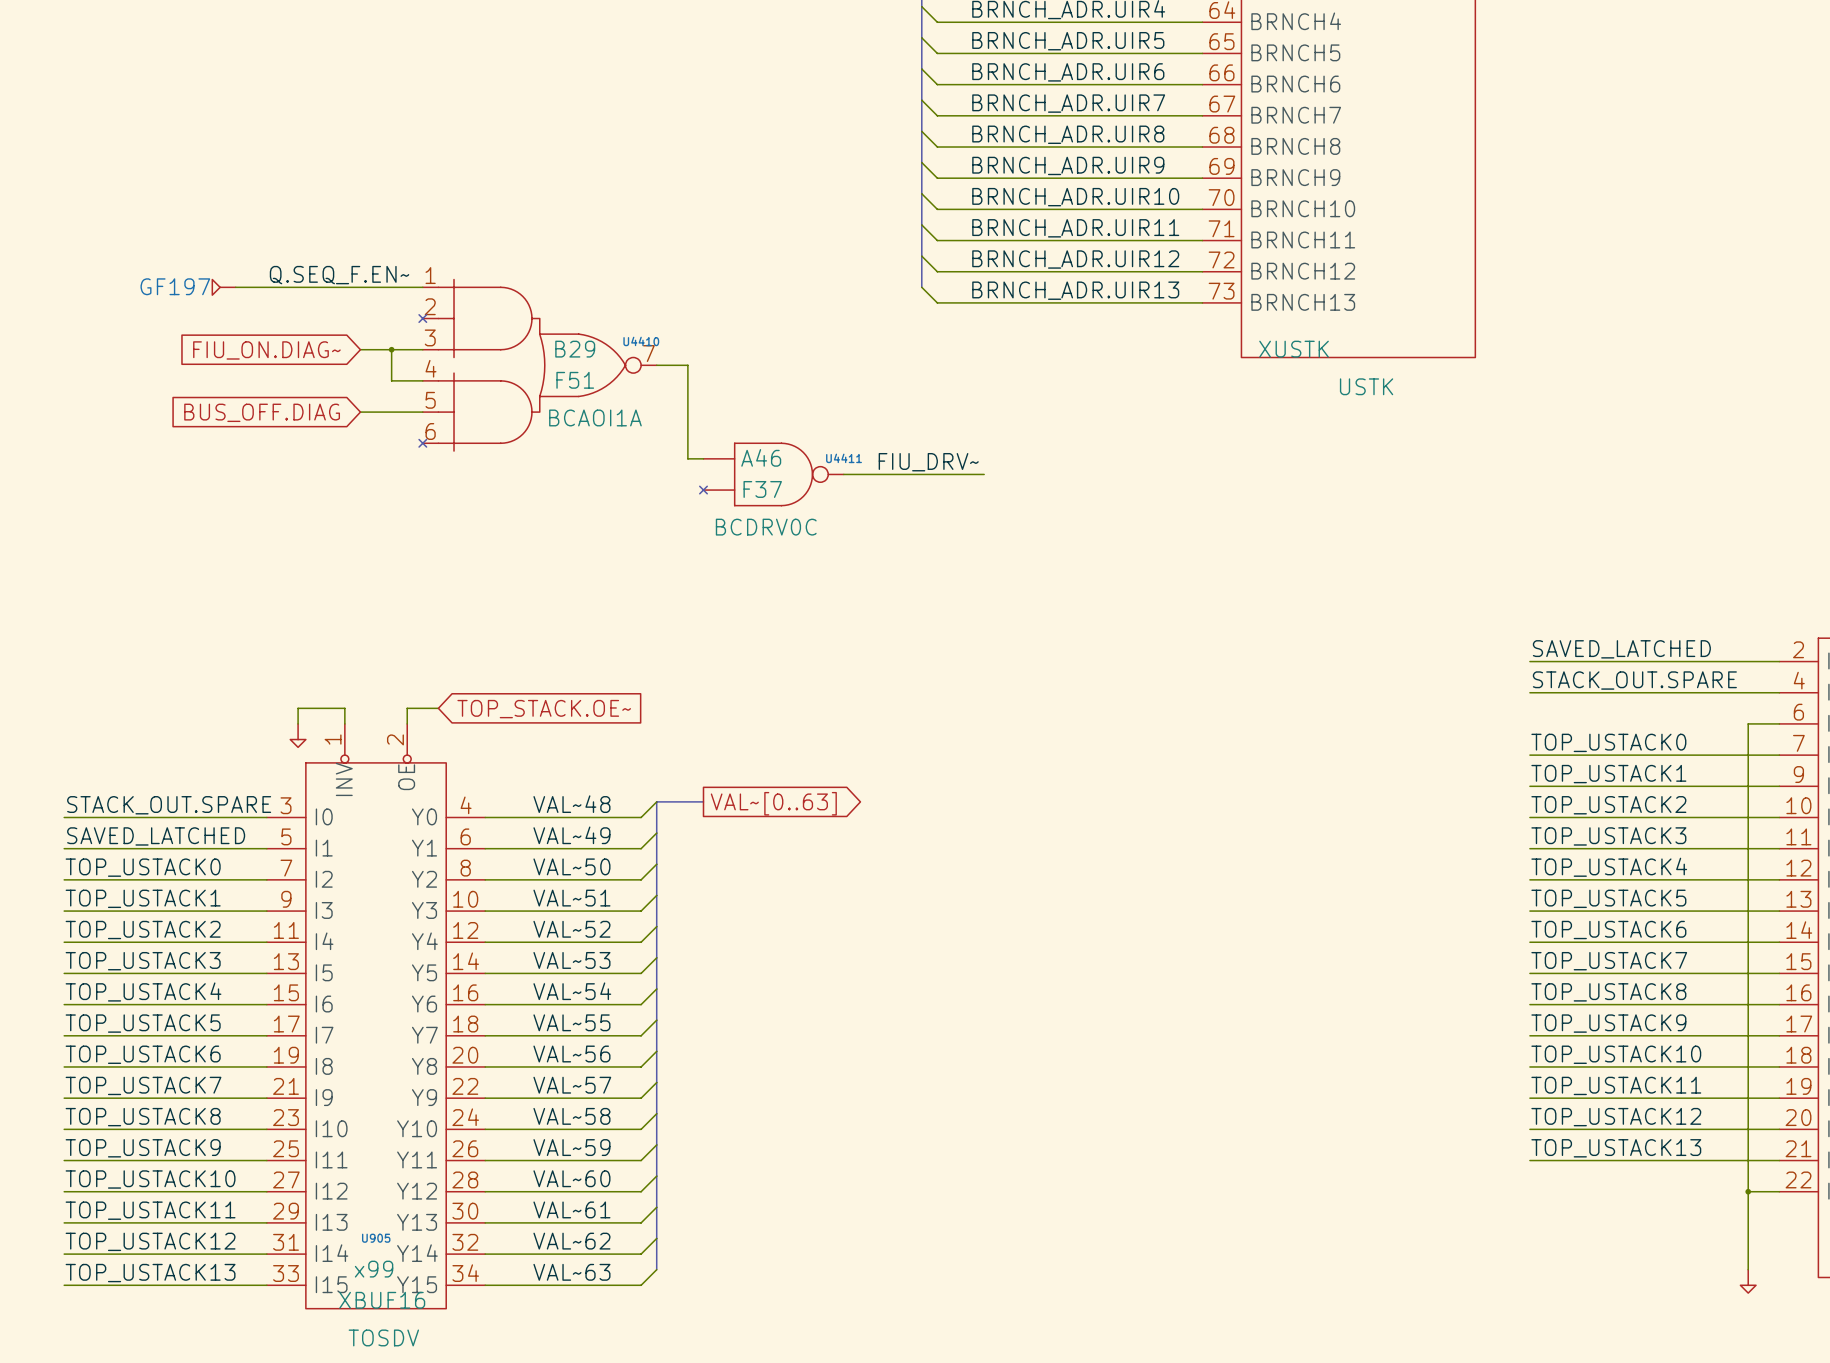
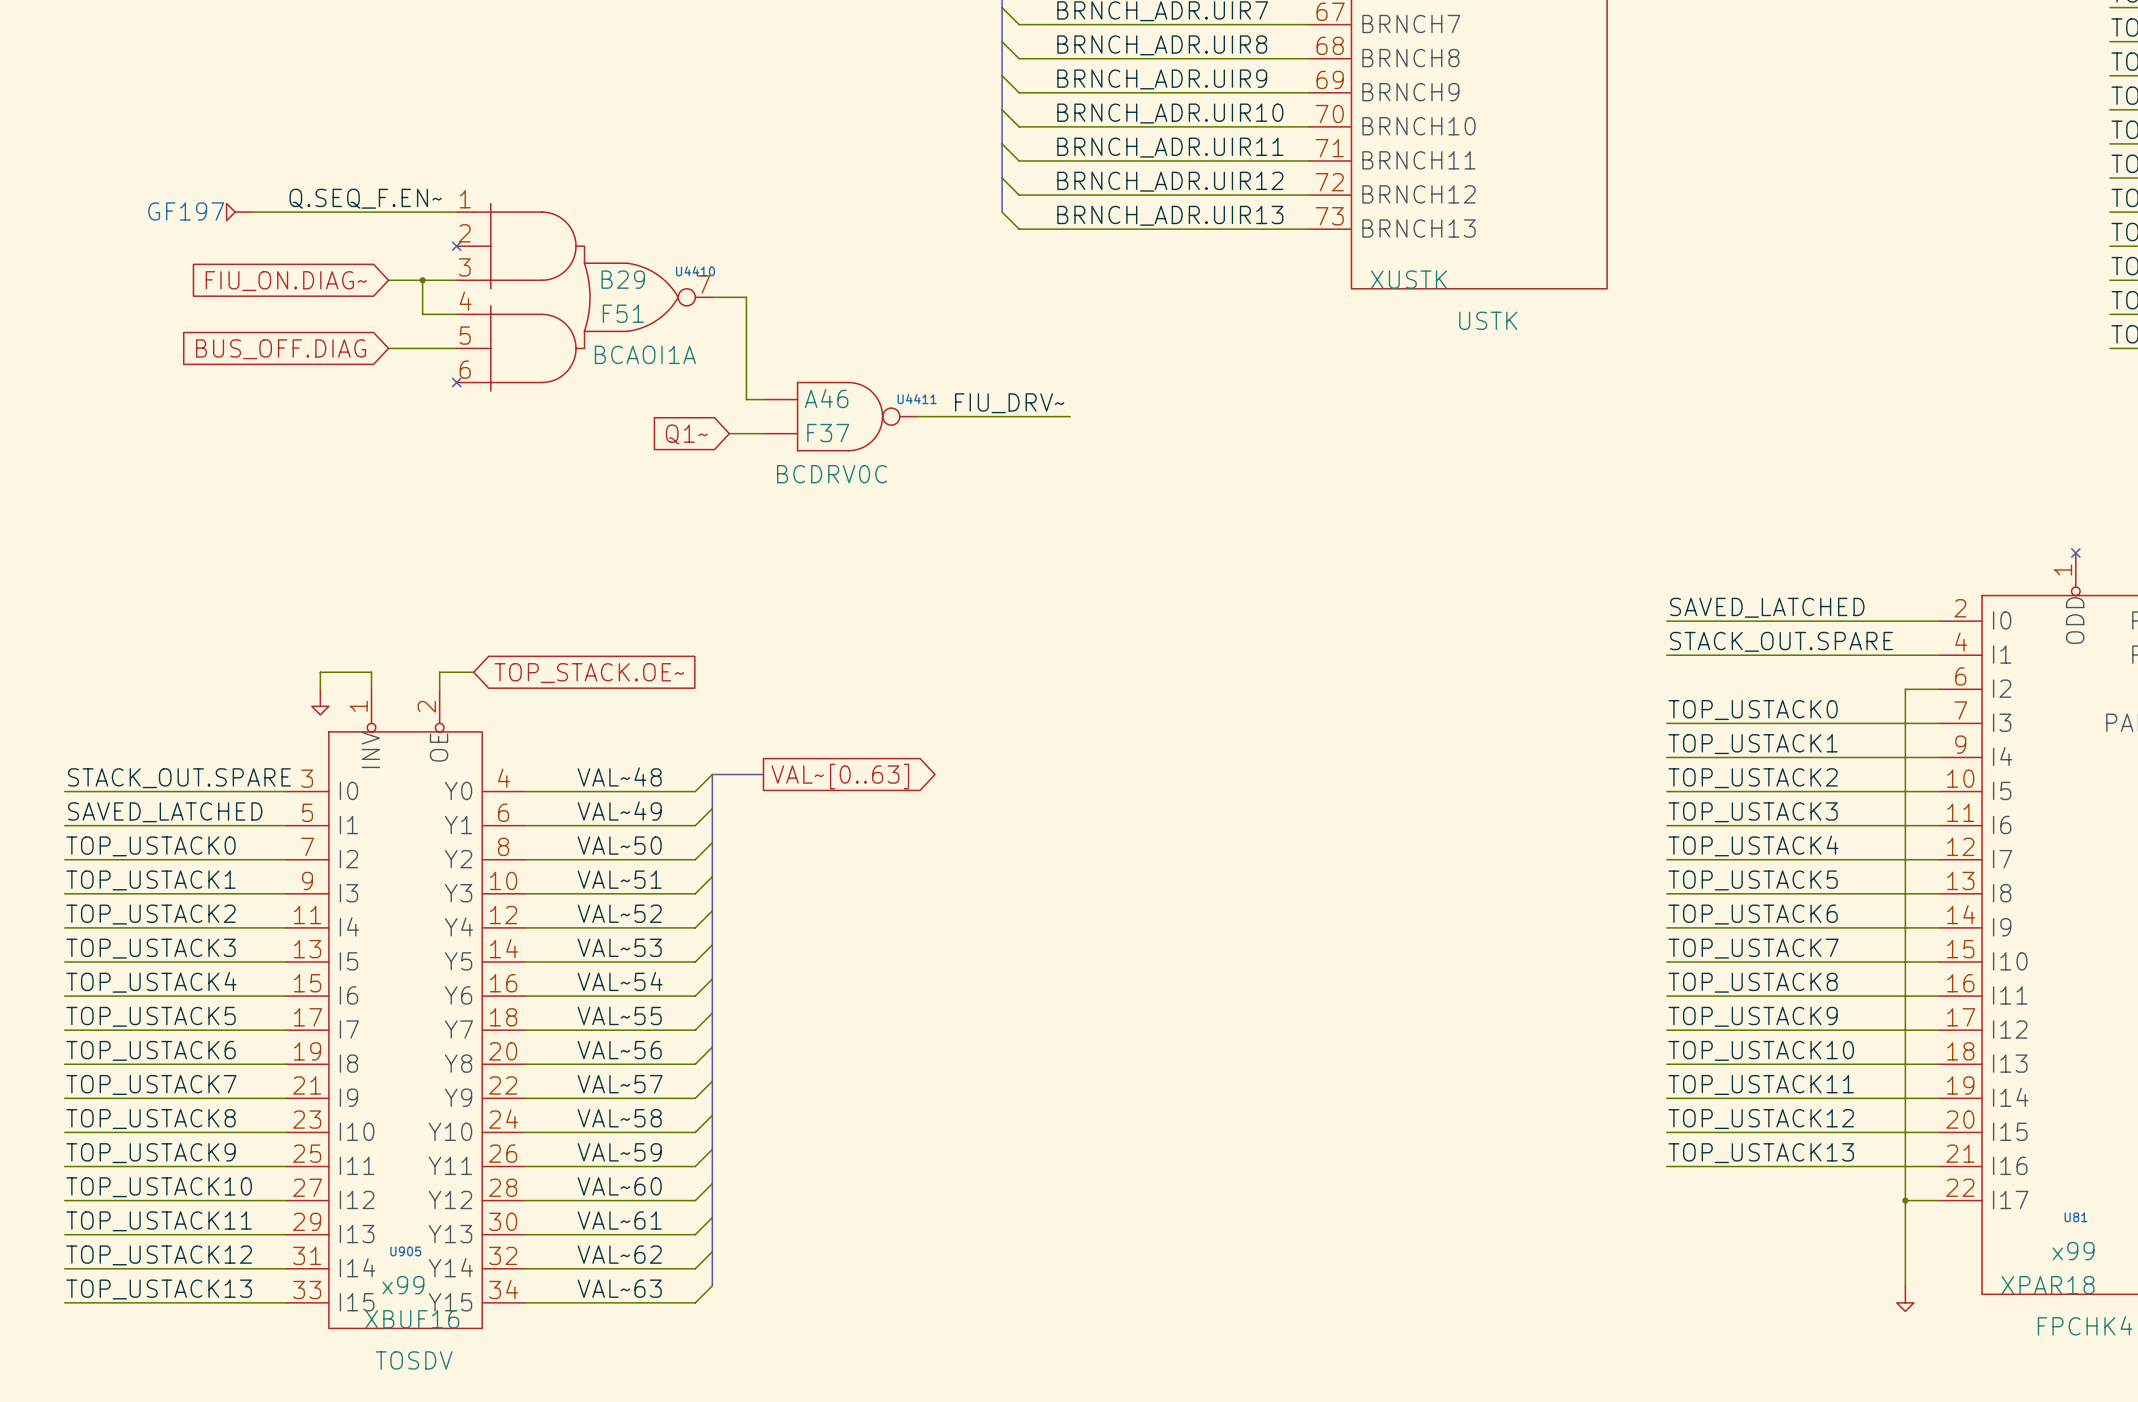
global label: none -> Q1~ (686, 434)
wire: none -> (729, 433) (763, 433)
no-connect mark: (703, 490) -> none

